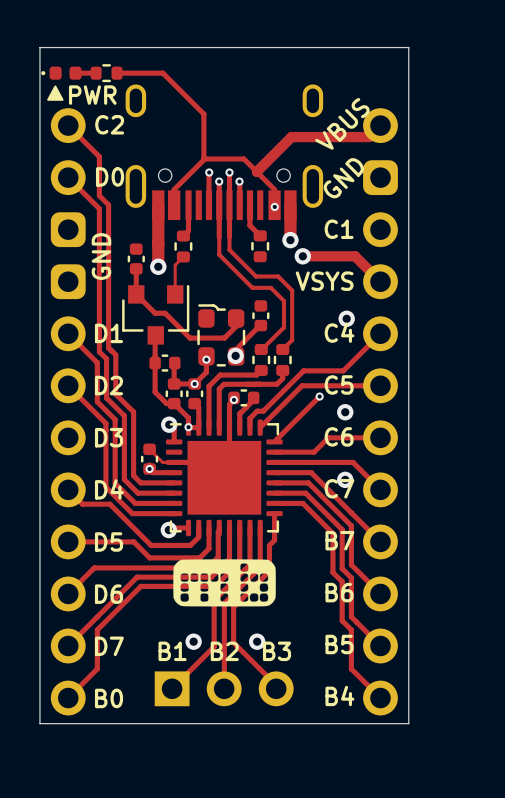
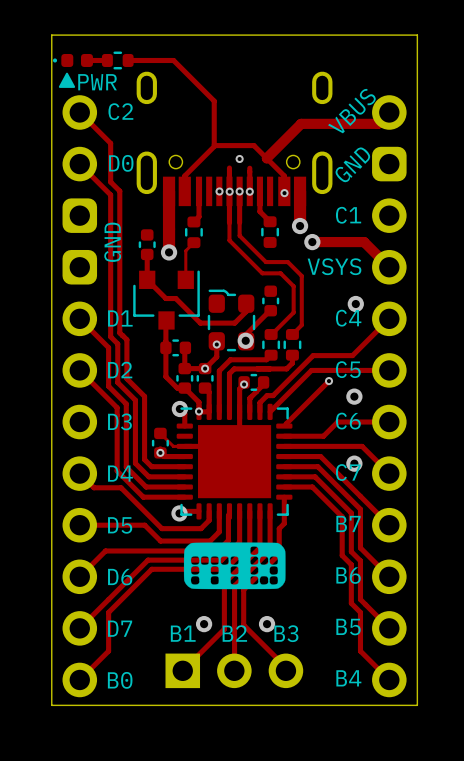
track: (209, 172) (209, 205) -> none
via: (209, 172) -> none
track: (229, 172) (229, 205) -> none
via: (219, 181) -> none
via: (239, 181) -> none
via: none -> (219, 191)
via: none -> (229, 191)
via: none -> (239, 191)
via: none -> (249, 191)

